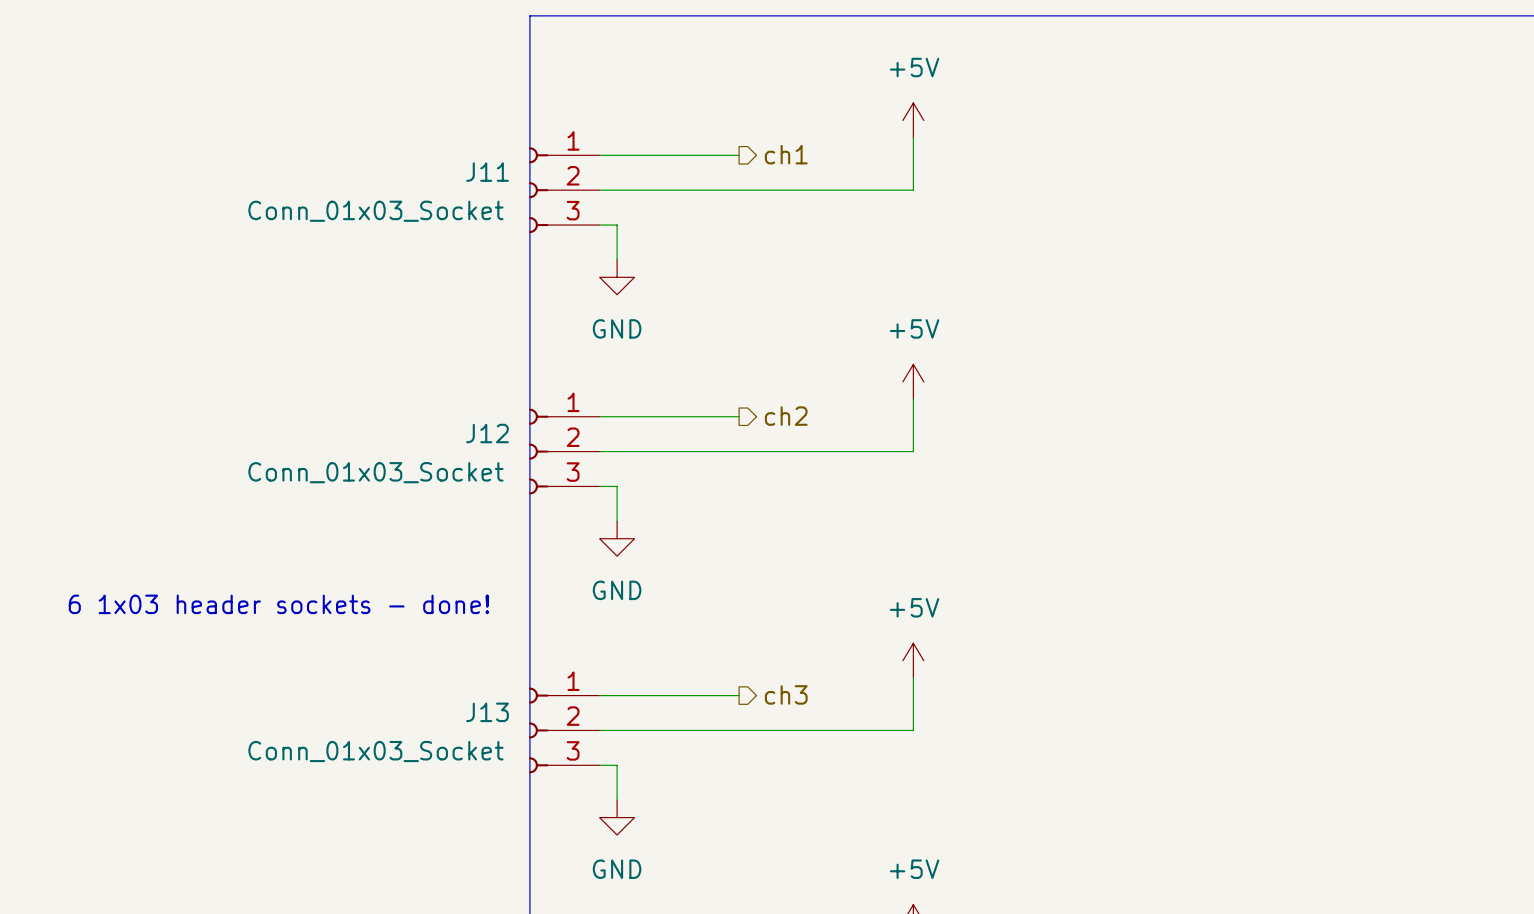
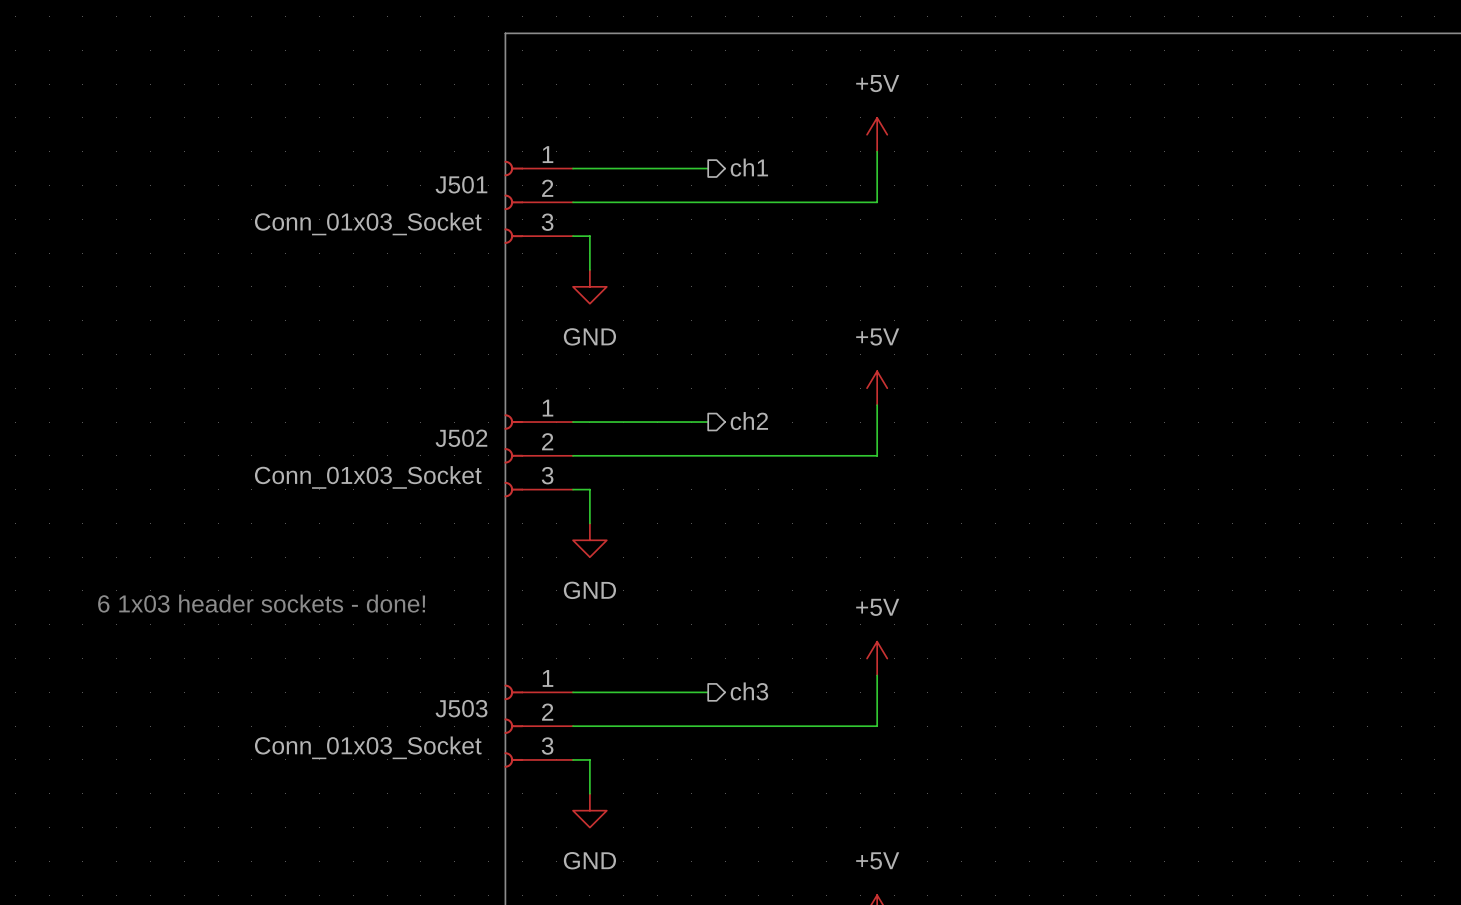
J11 name: J11 (487, 172) -> J501 (461, 184)
J12 name: J12 (487, 433) -> J502 (461, 438)
J13 name: J13 (487, 712) -> J503 (461, 708)

